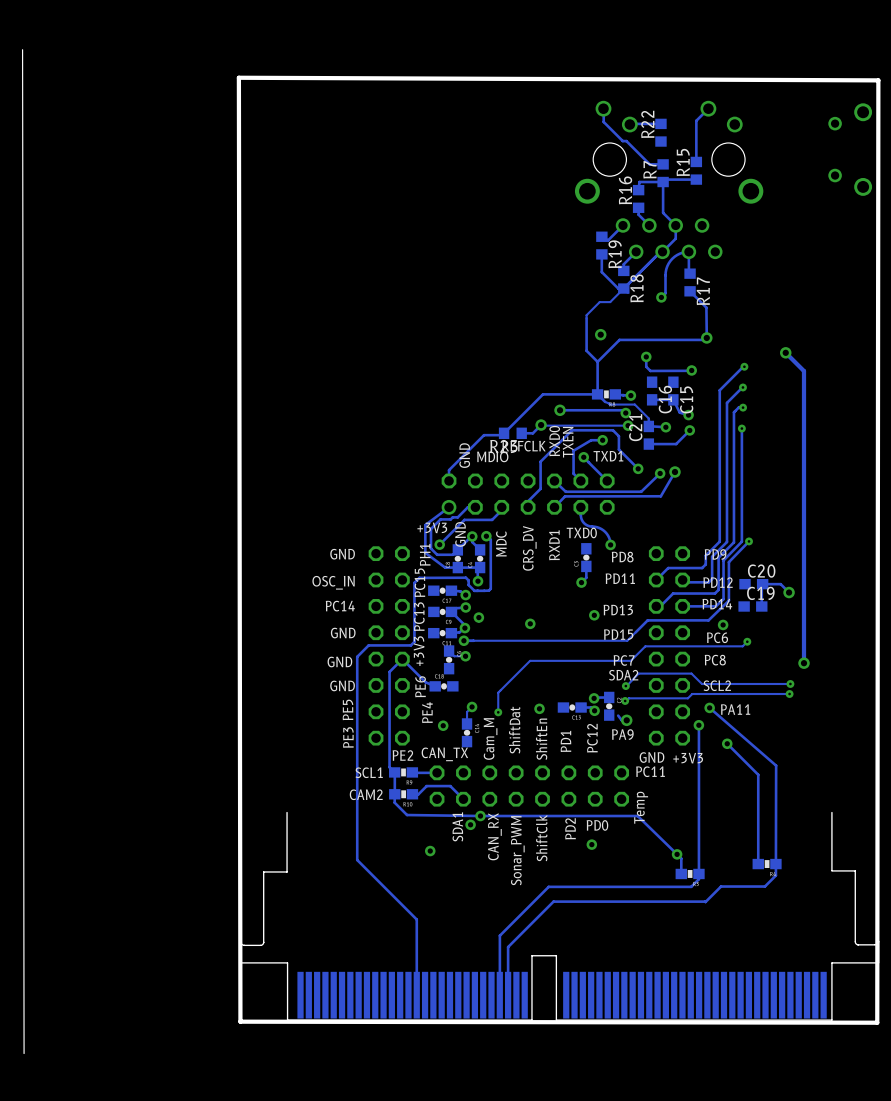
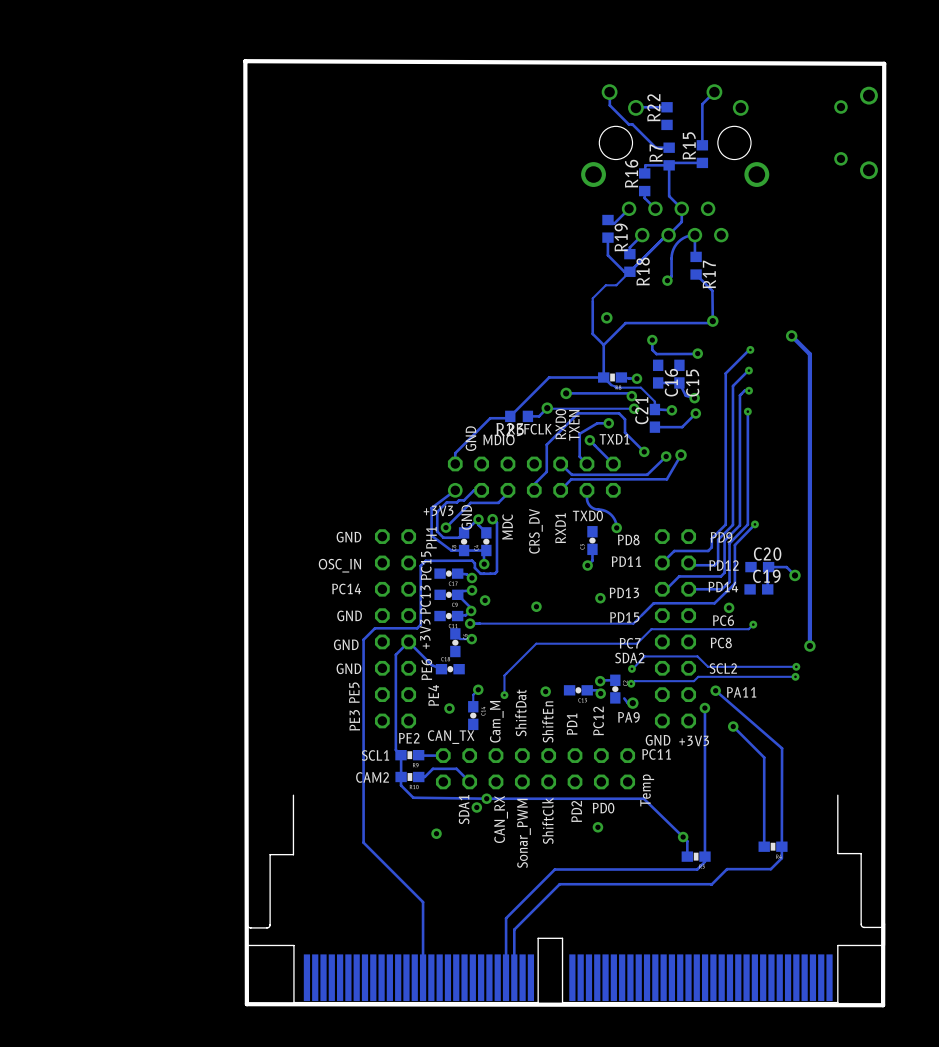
board edge: (22, 49) (24, 1053) -> none

